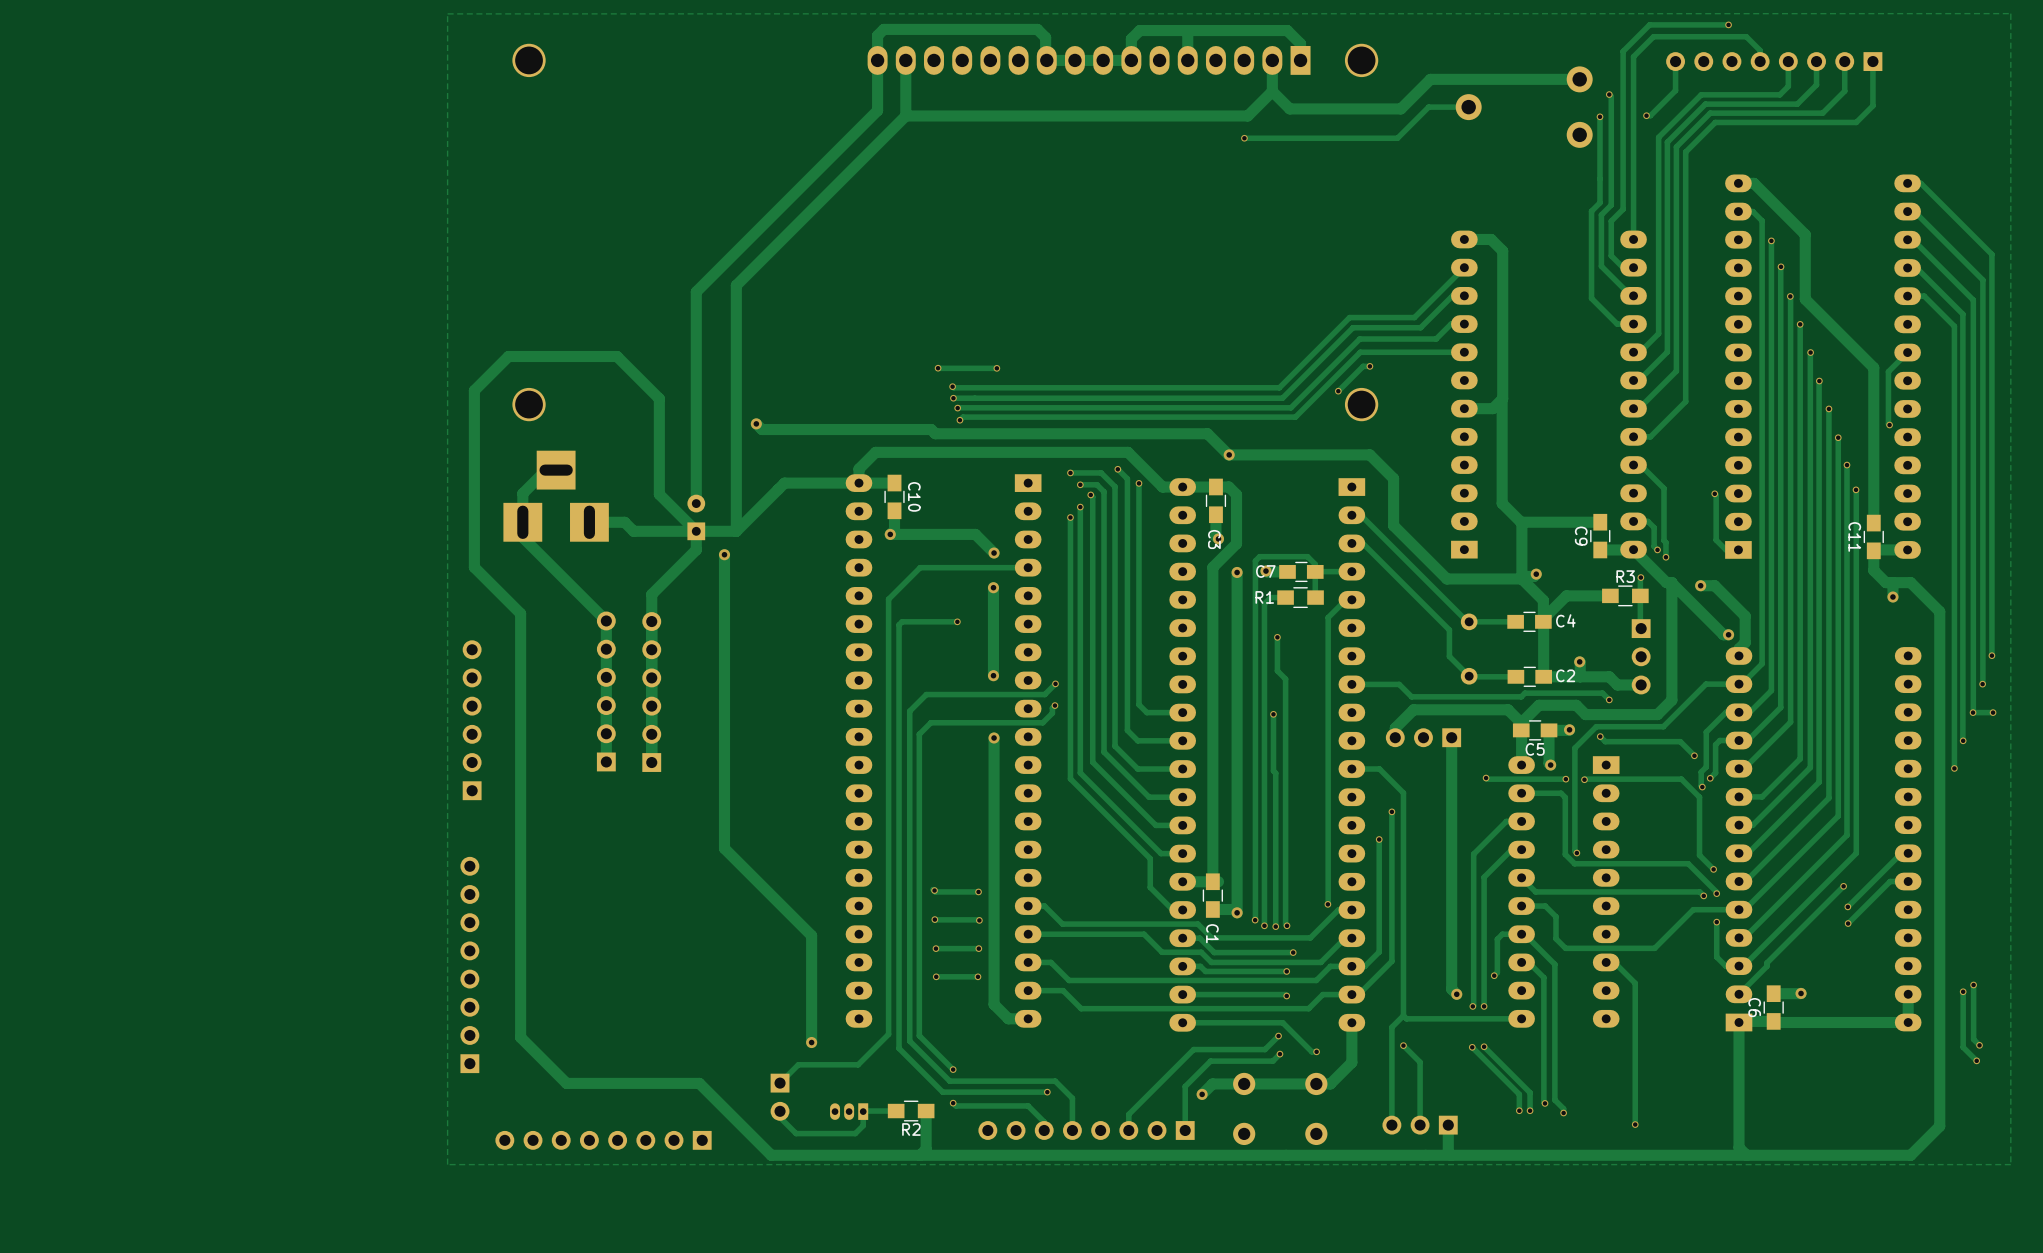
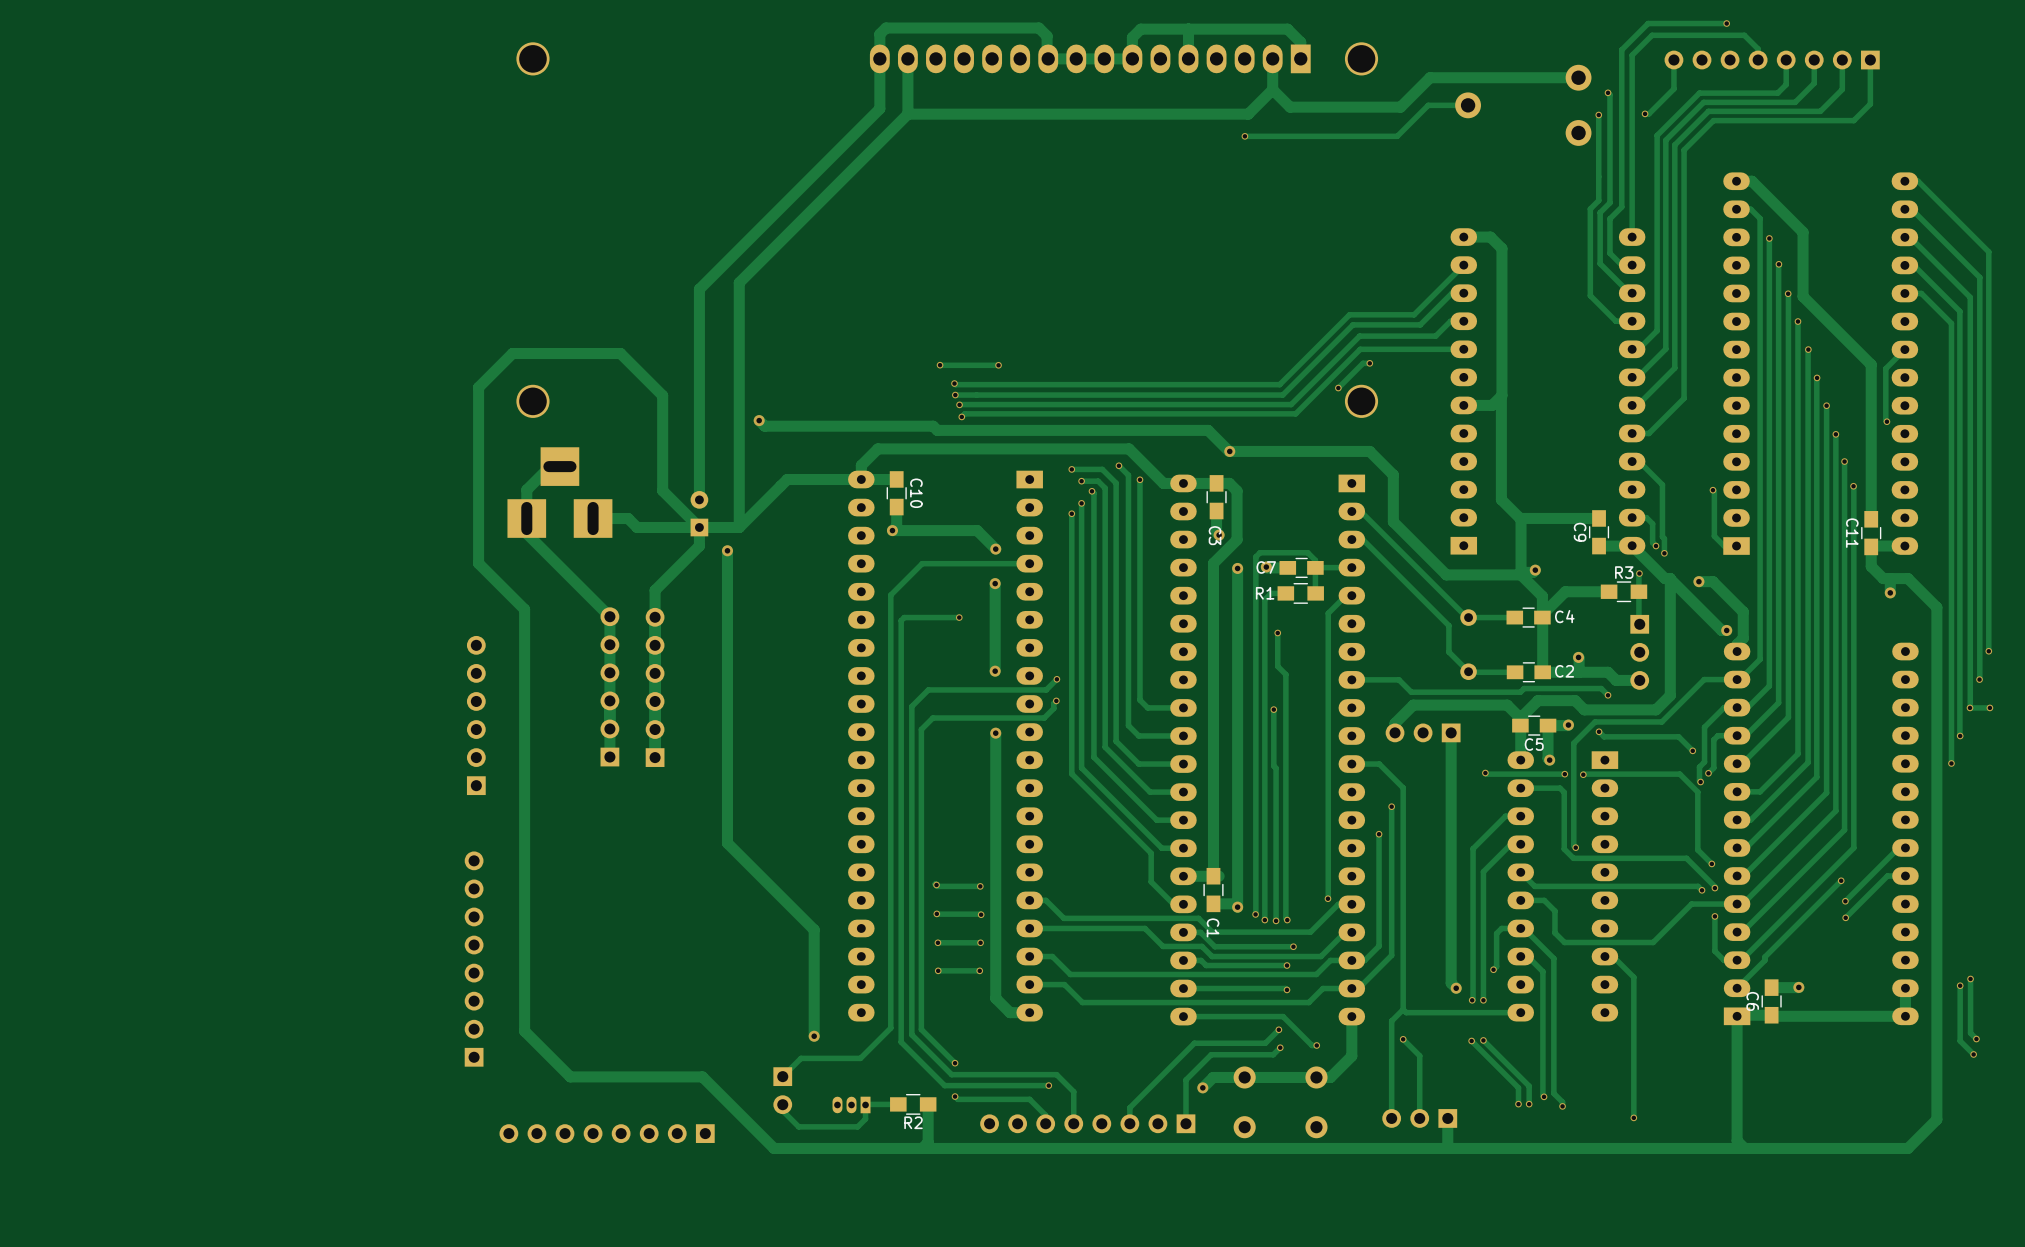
zone outline: (2010, 13) (2010, 1164) (447, 1164) (447, 13) (2010, 13) -> none

